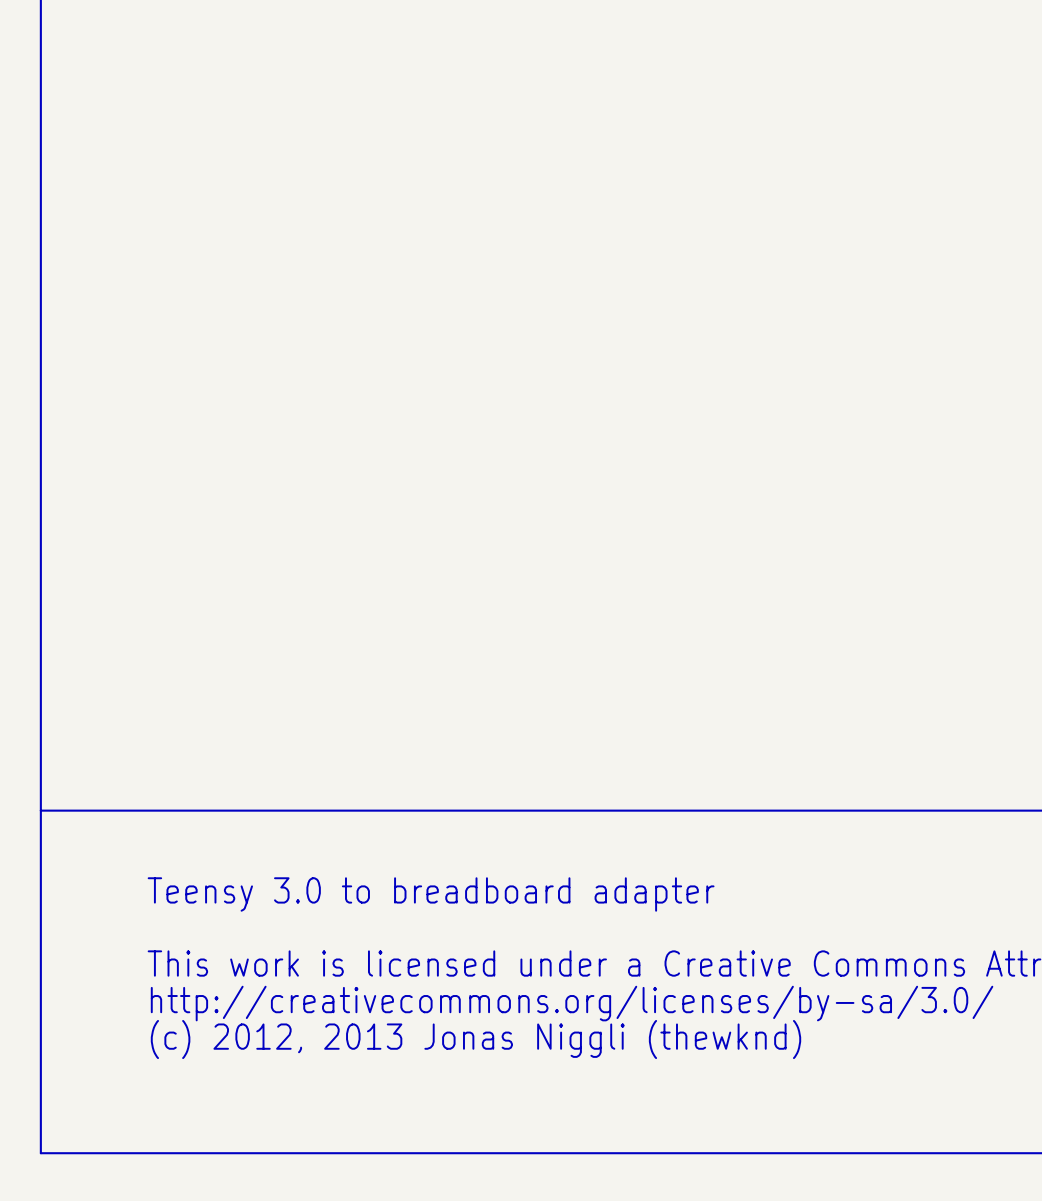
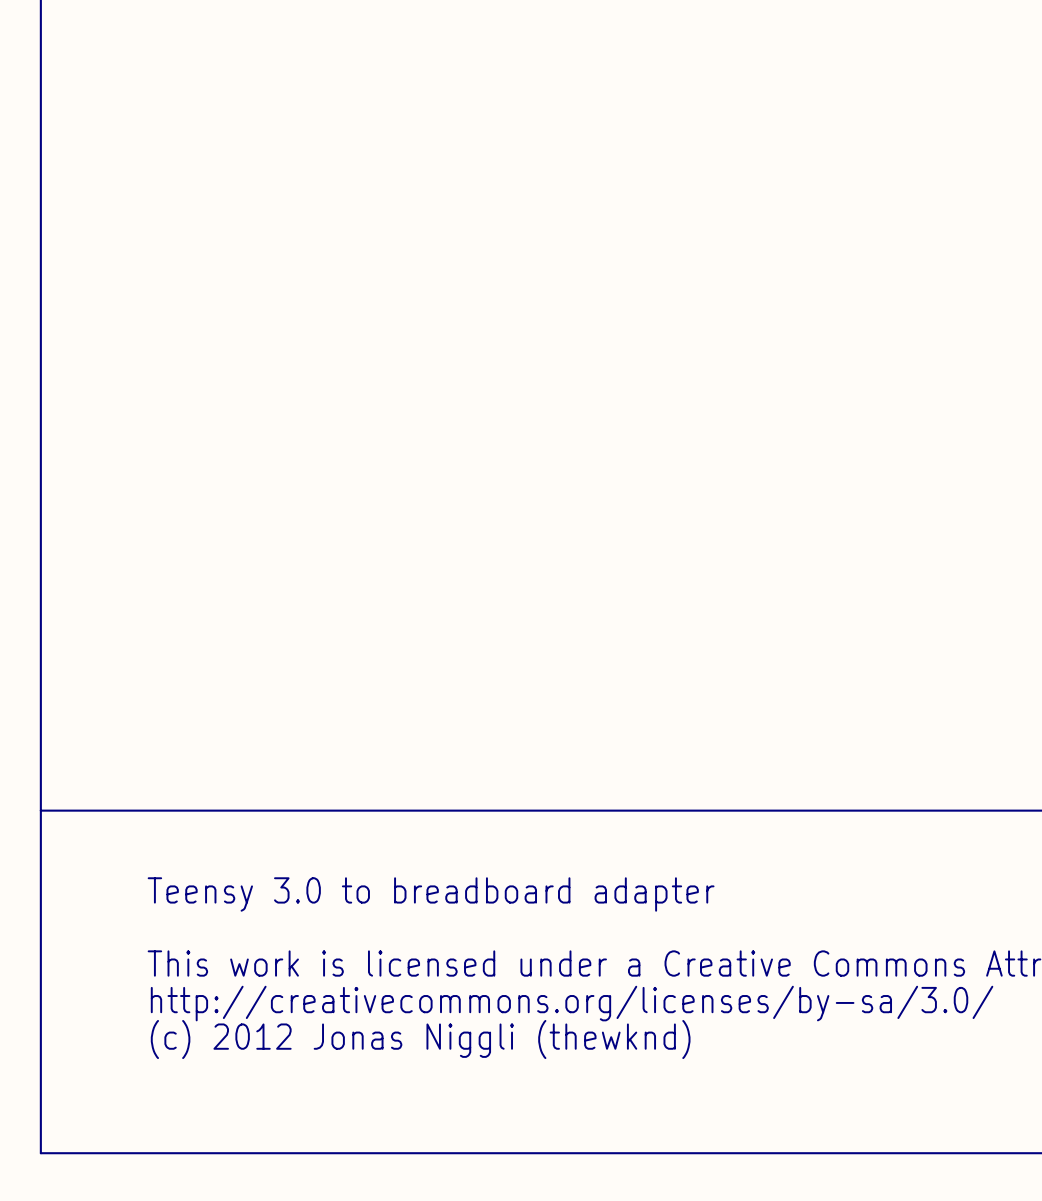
text: (c) 2012, 2013 Jonas Niggli (thewknd) (475, 1039) -> (c) 2012 Jonas Niggli (thewknd) (420, 1039)

